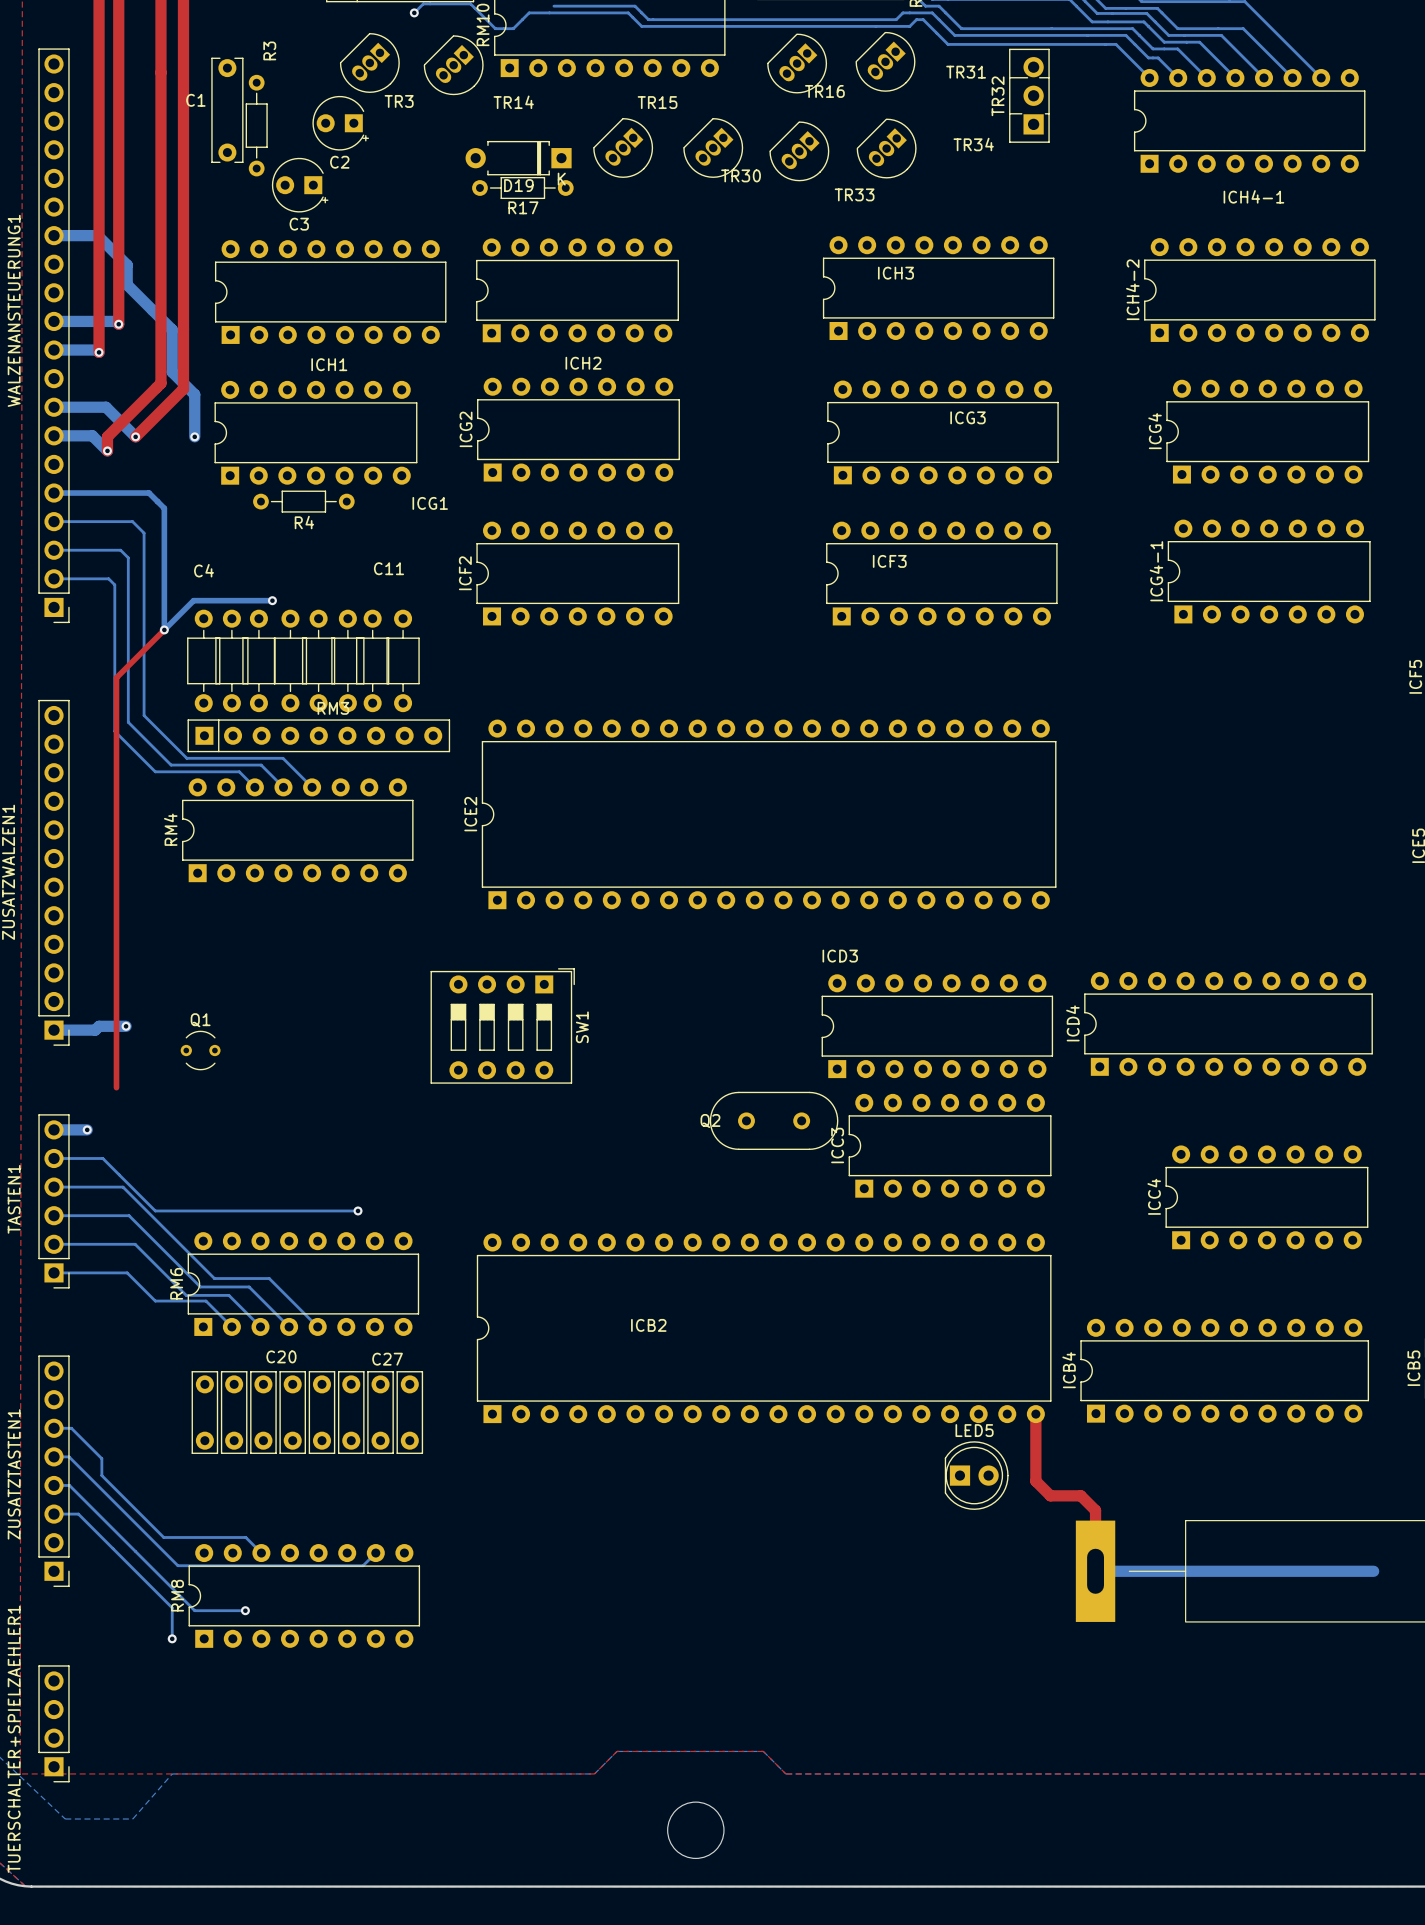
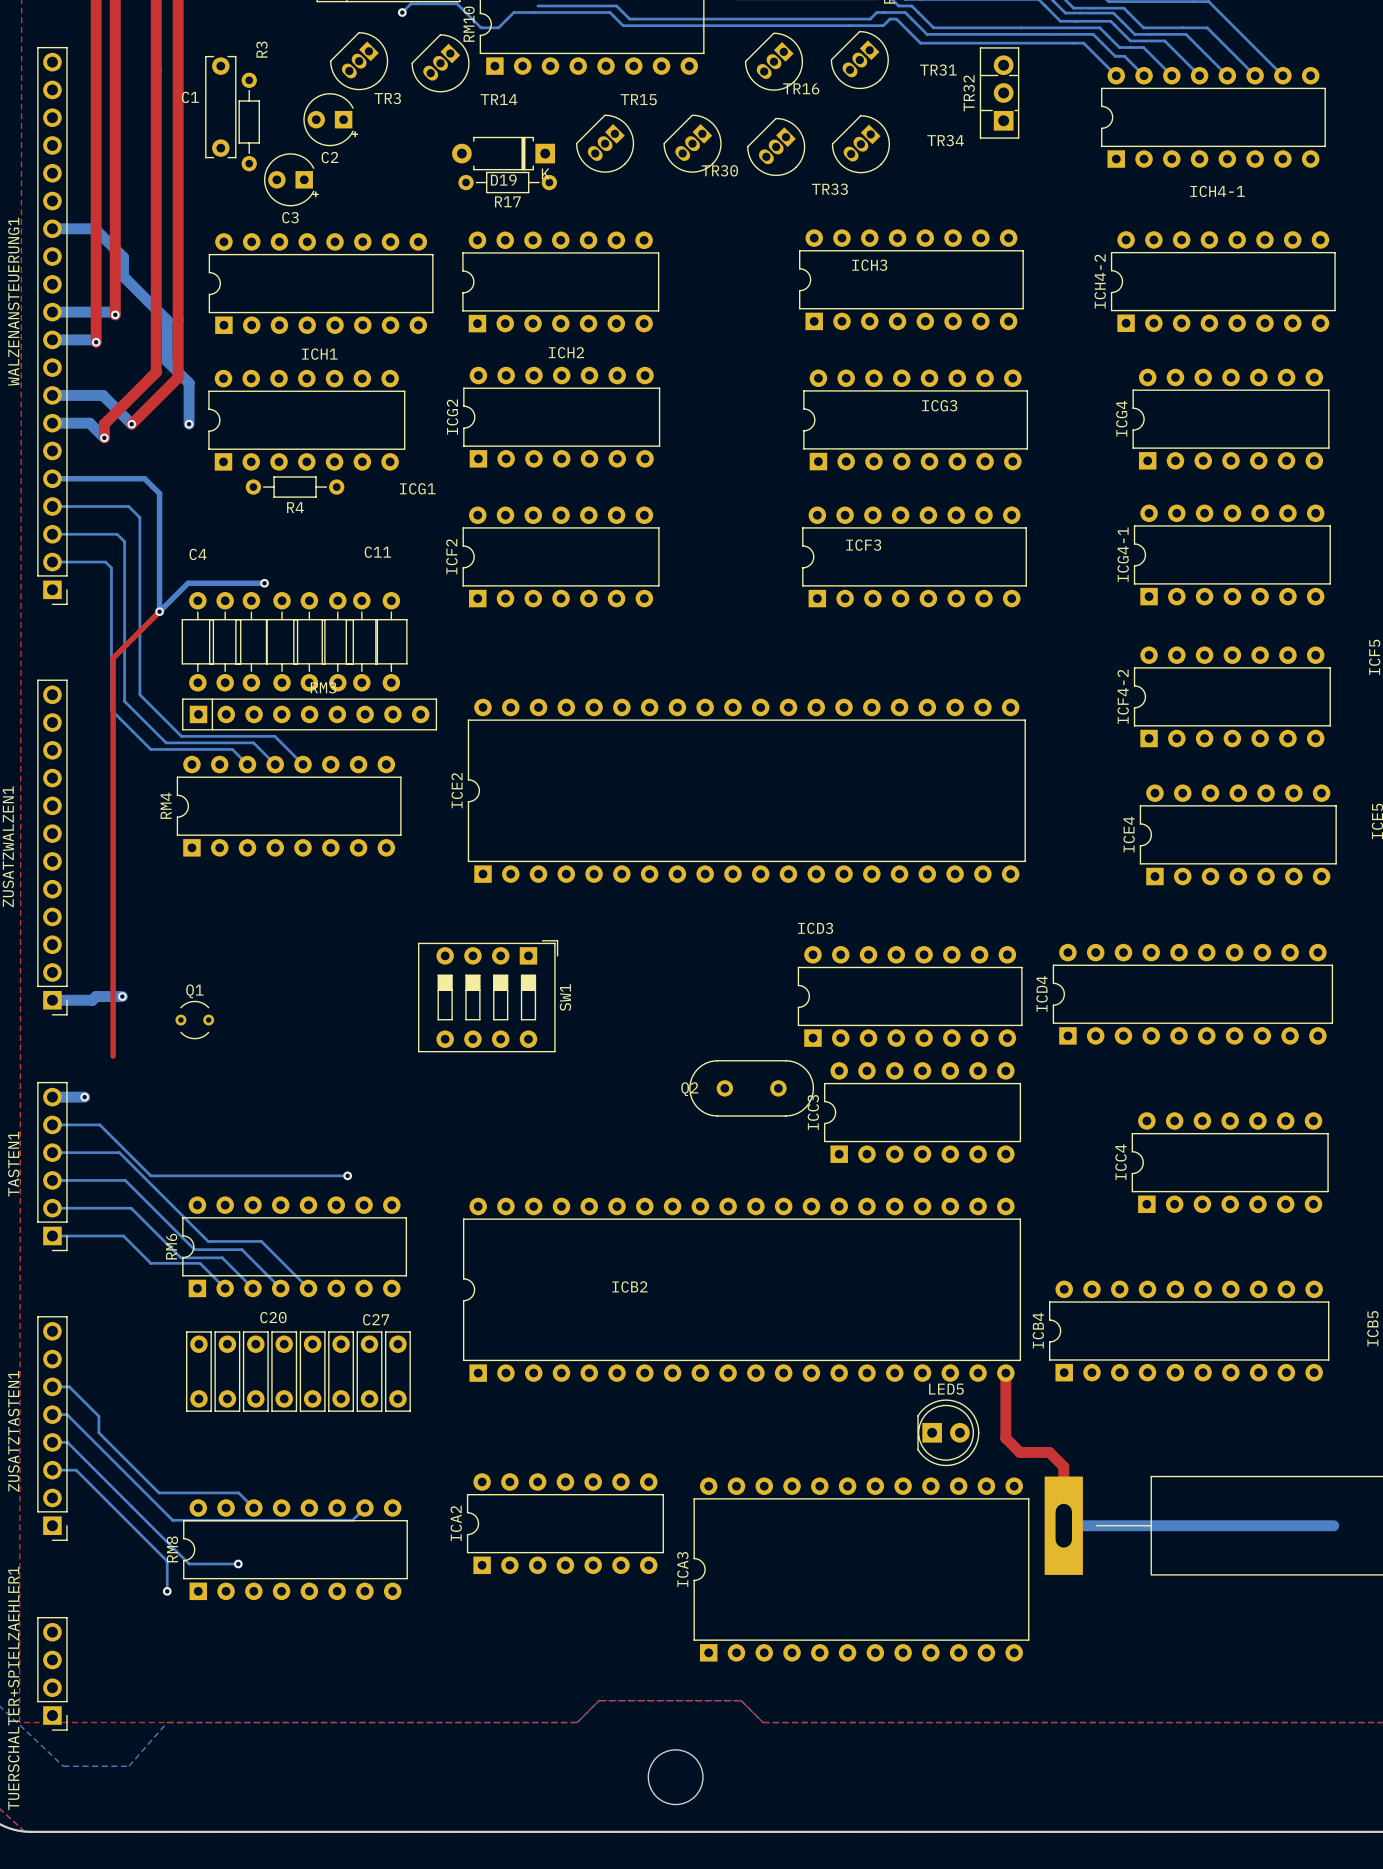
ICF4-2: none -> (1232, 696)
ICE4: none -> (1238, 834)
ICA2: none -> (565, 1523)
ICA3: none -> (861, 1569)

